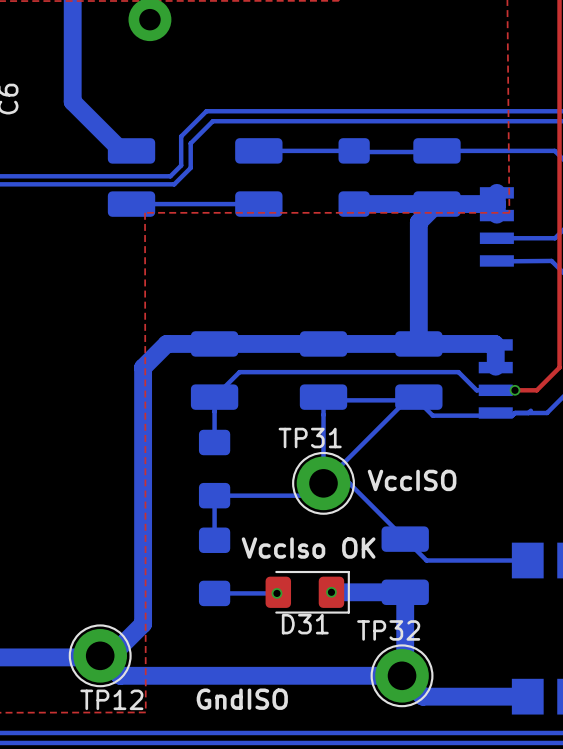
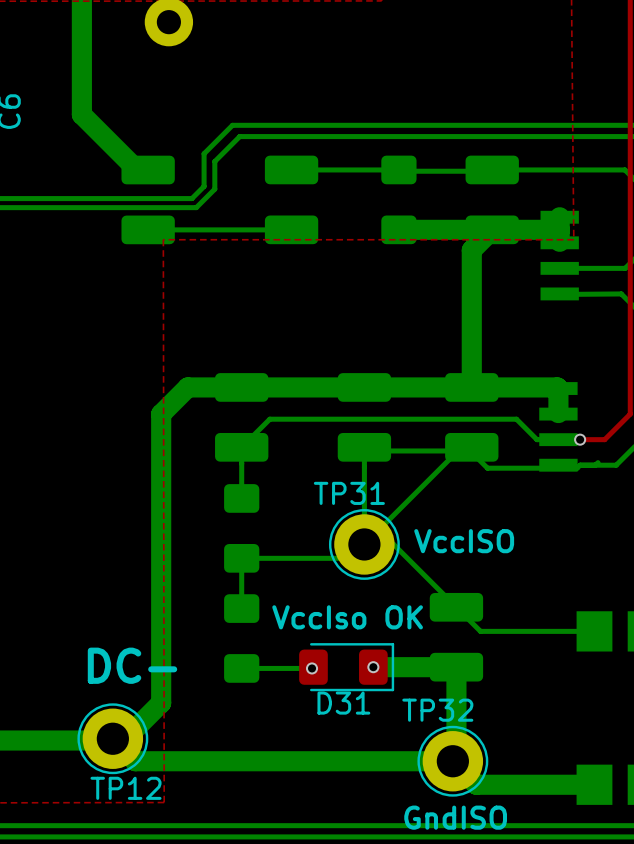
text: none -> DC- (132, 665)
text position: GndISO (242, 699) -> GndISO (455, 817)

